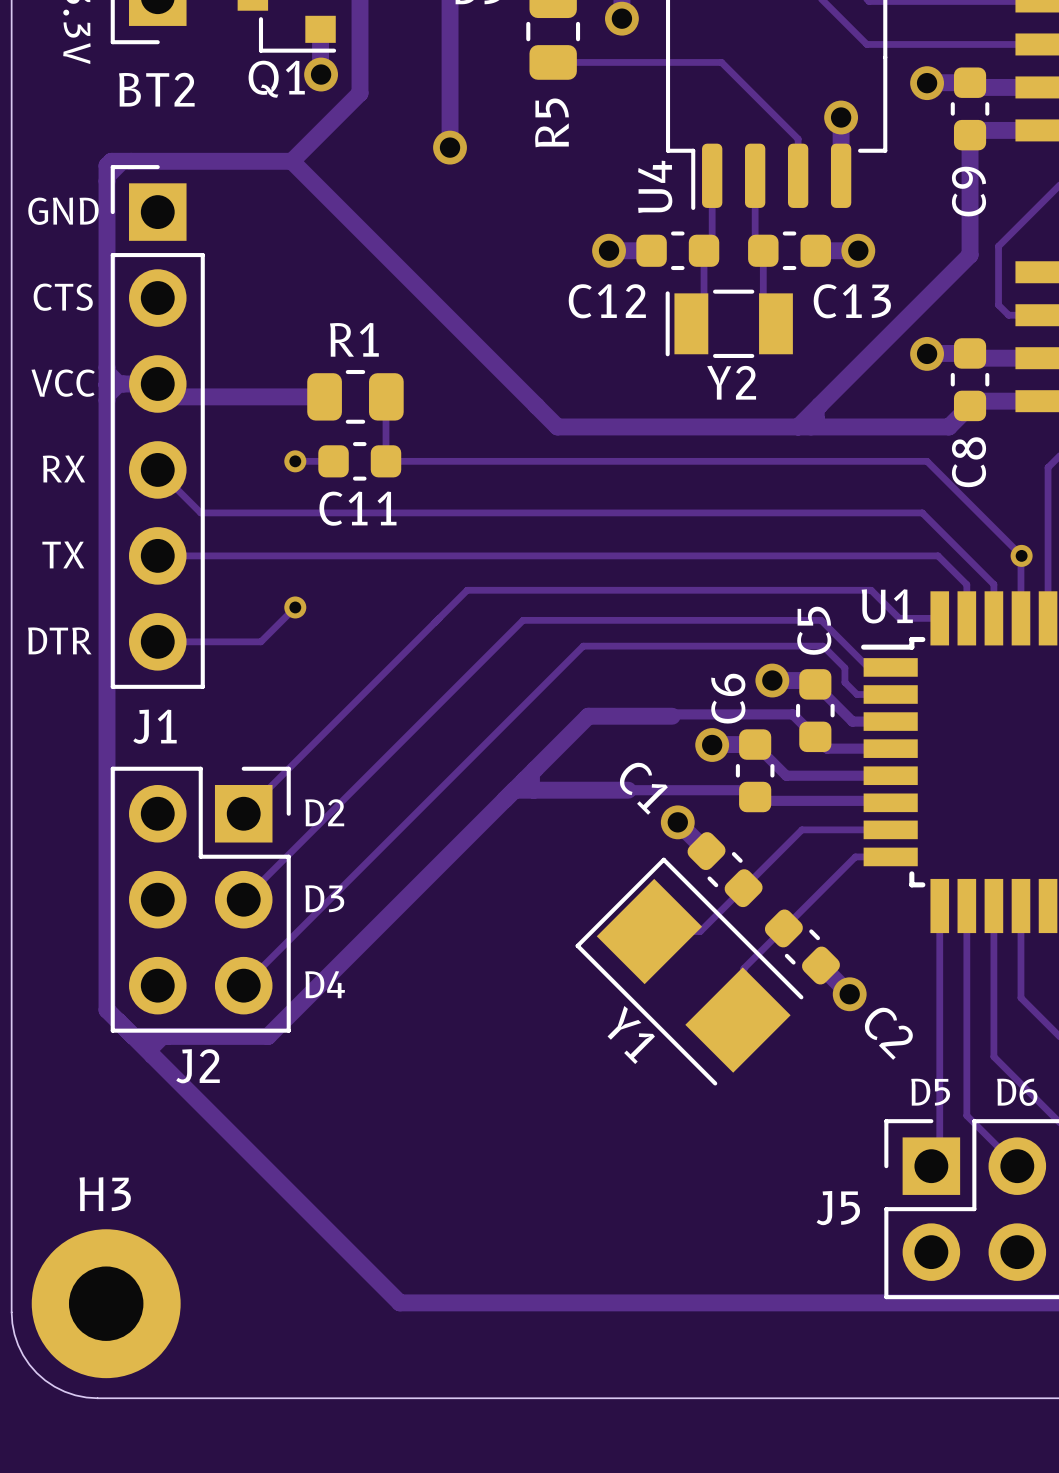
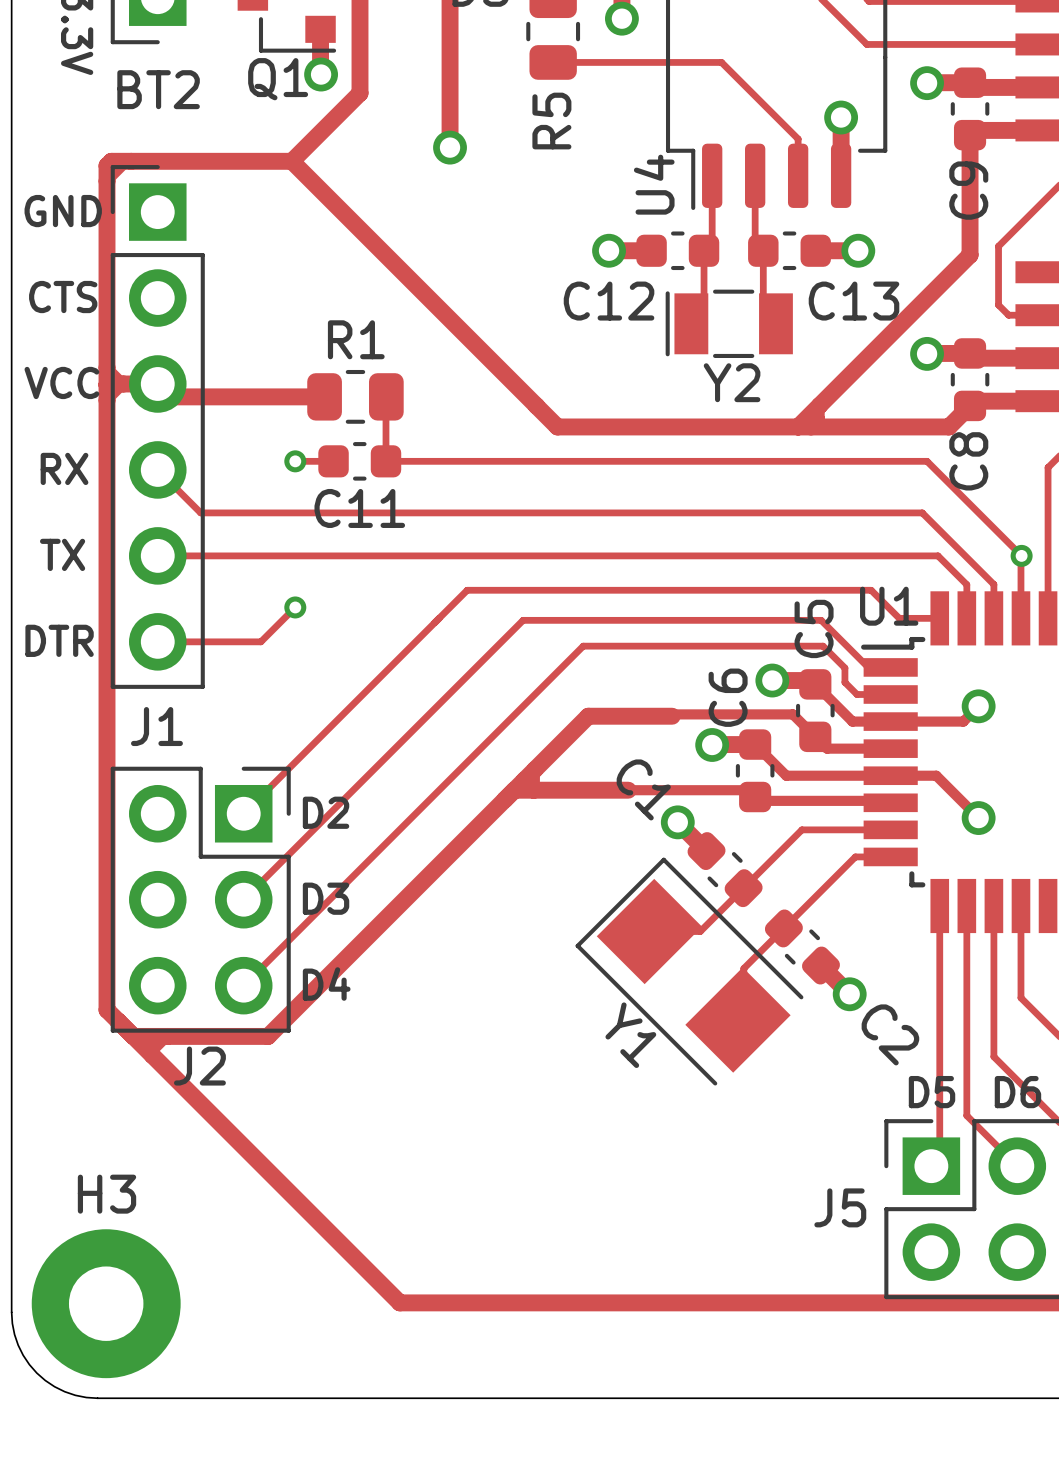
track: none -> (978, 706) (963, 721) (890, 721)
via: none -> (978, 706)
track: none -> (890, 775) (936, 775) (978, 818)
via: none -> (978, 818)

